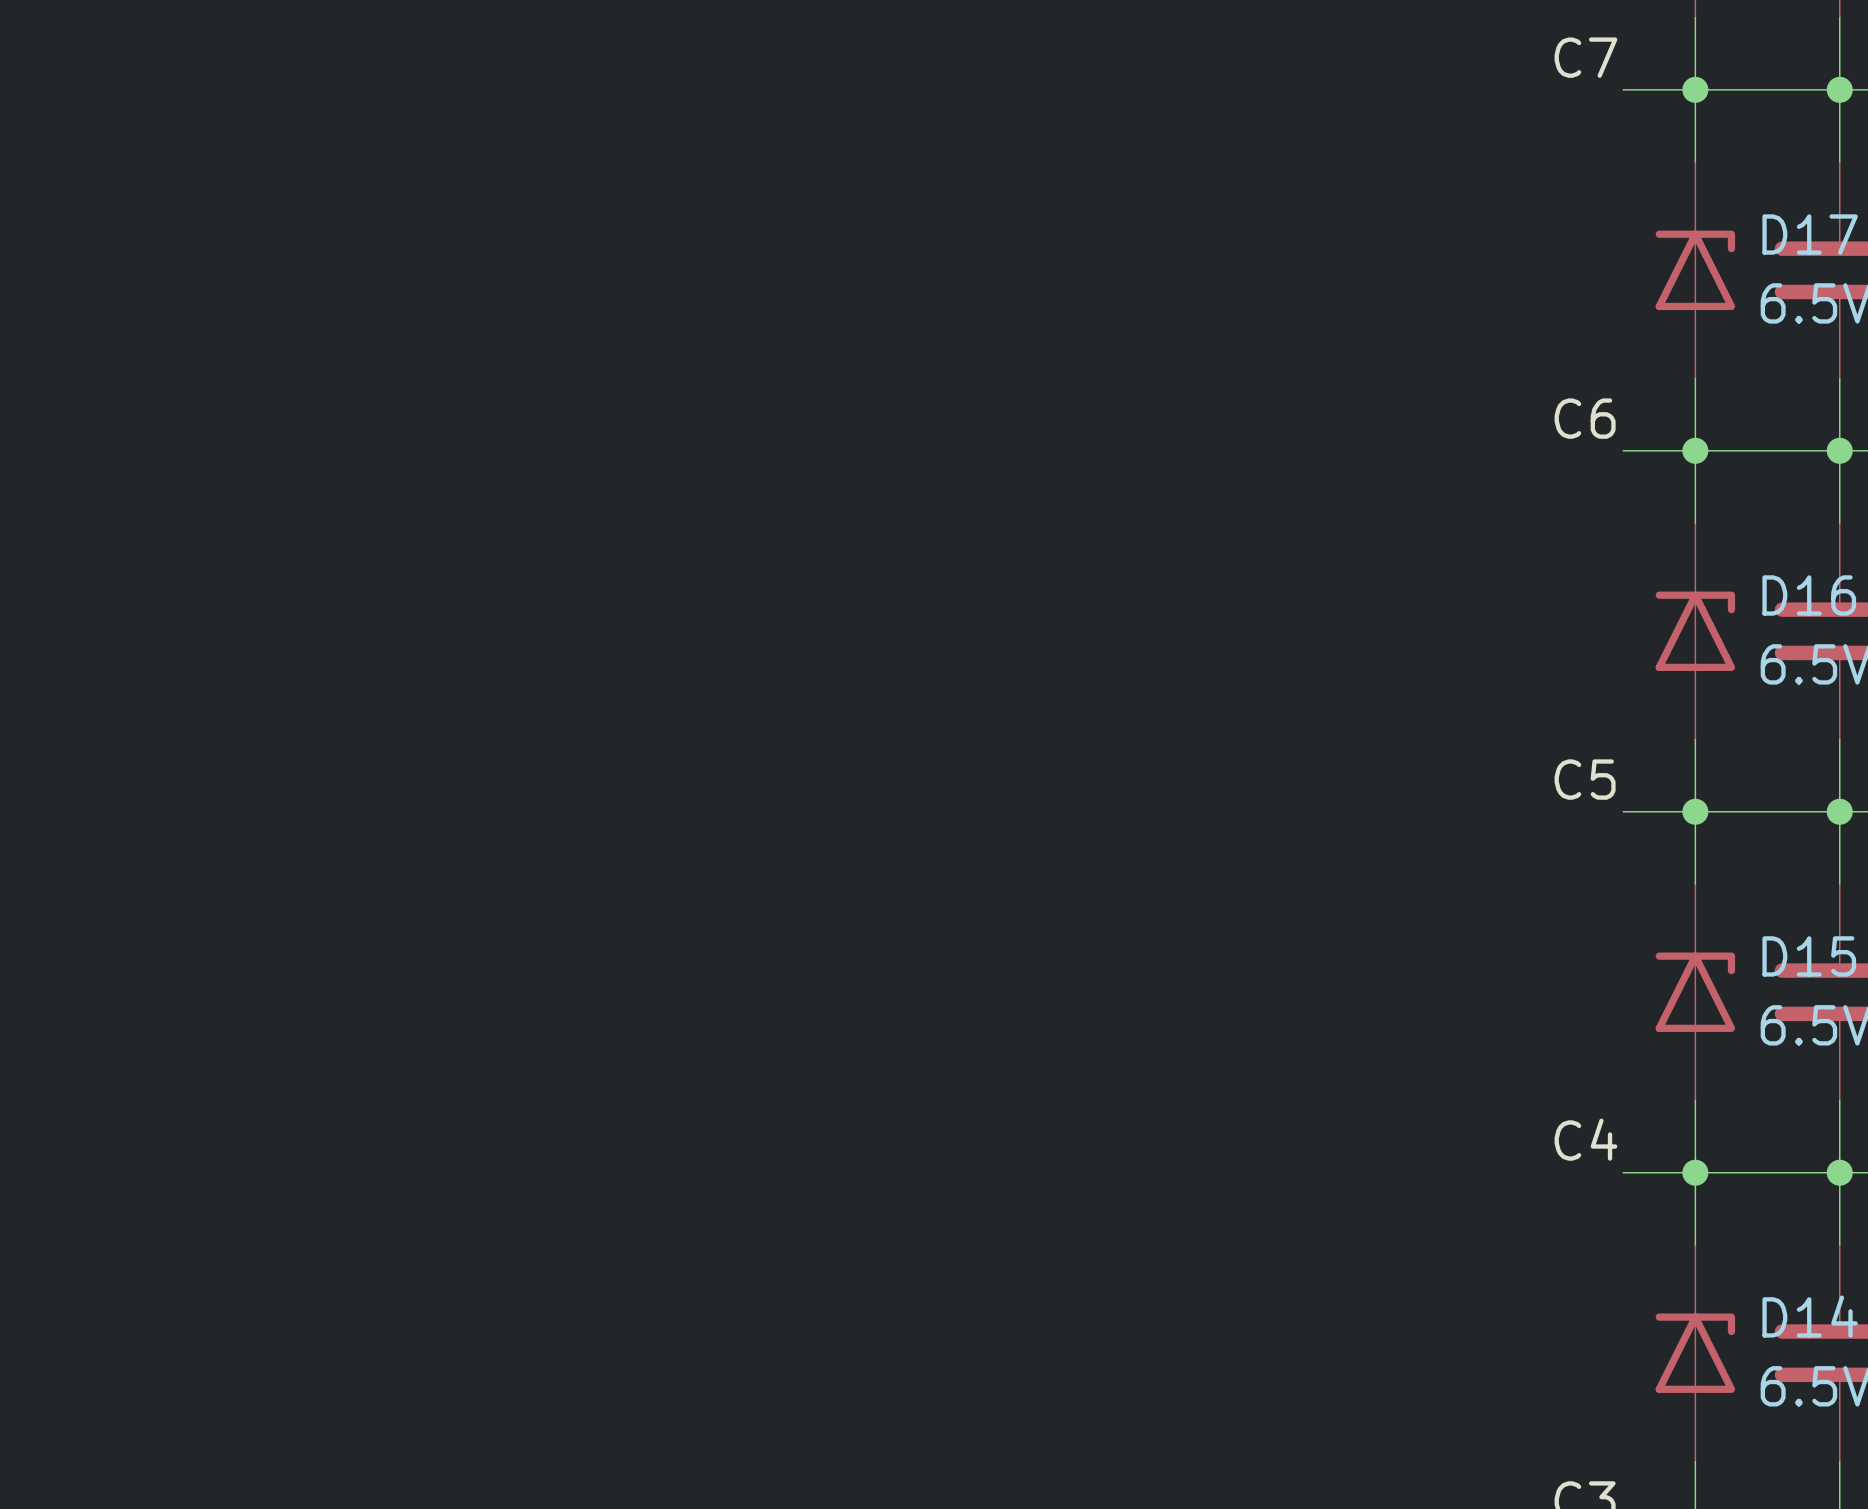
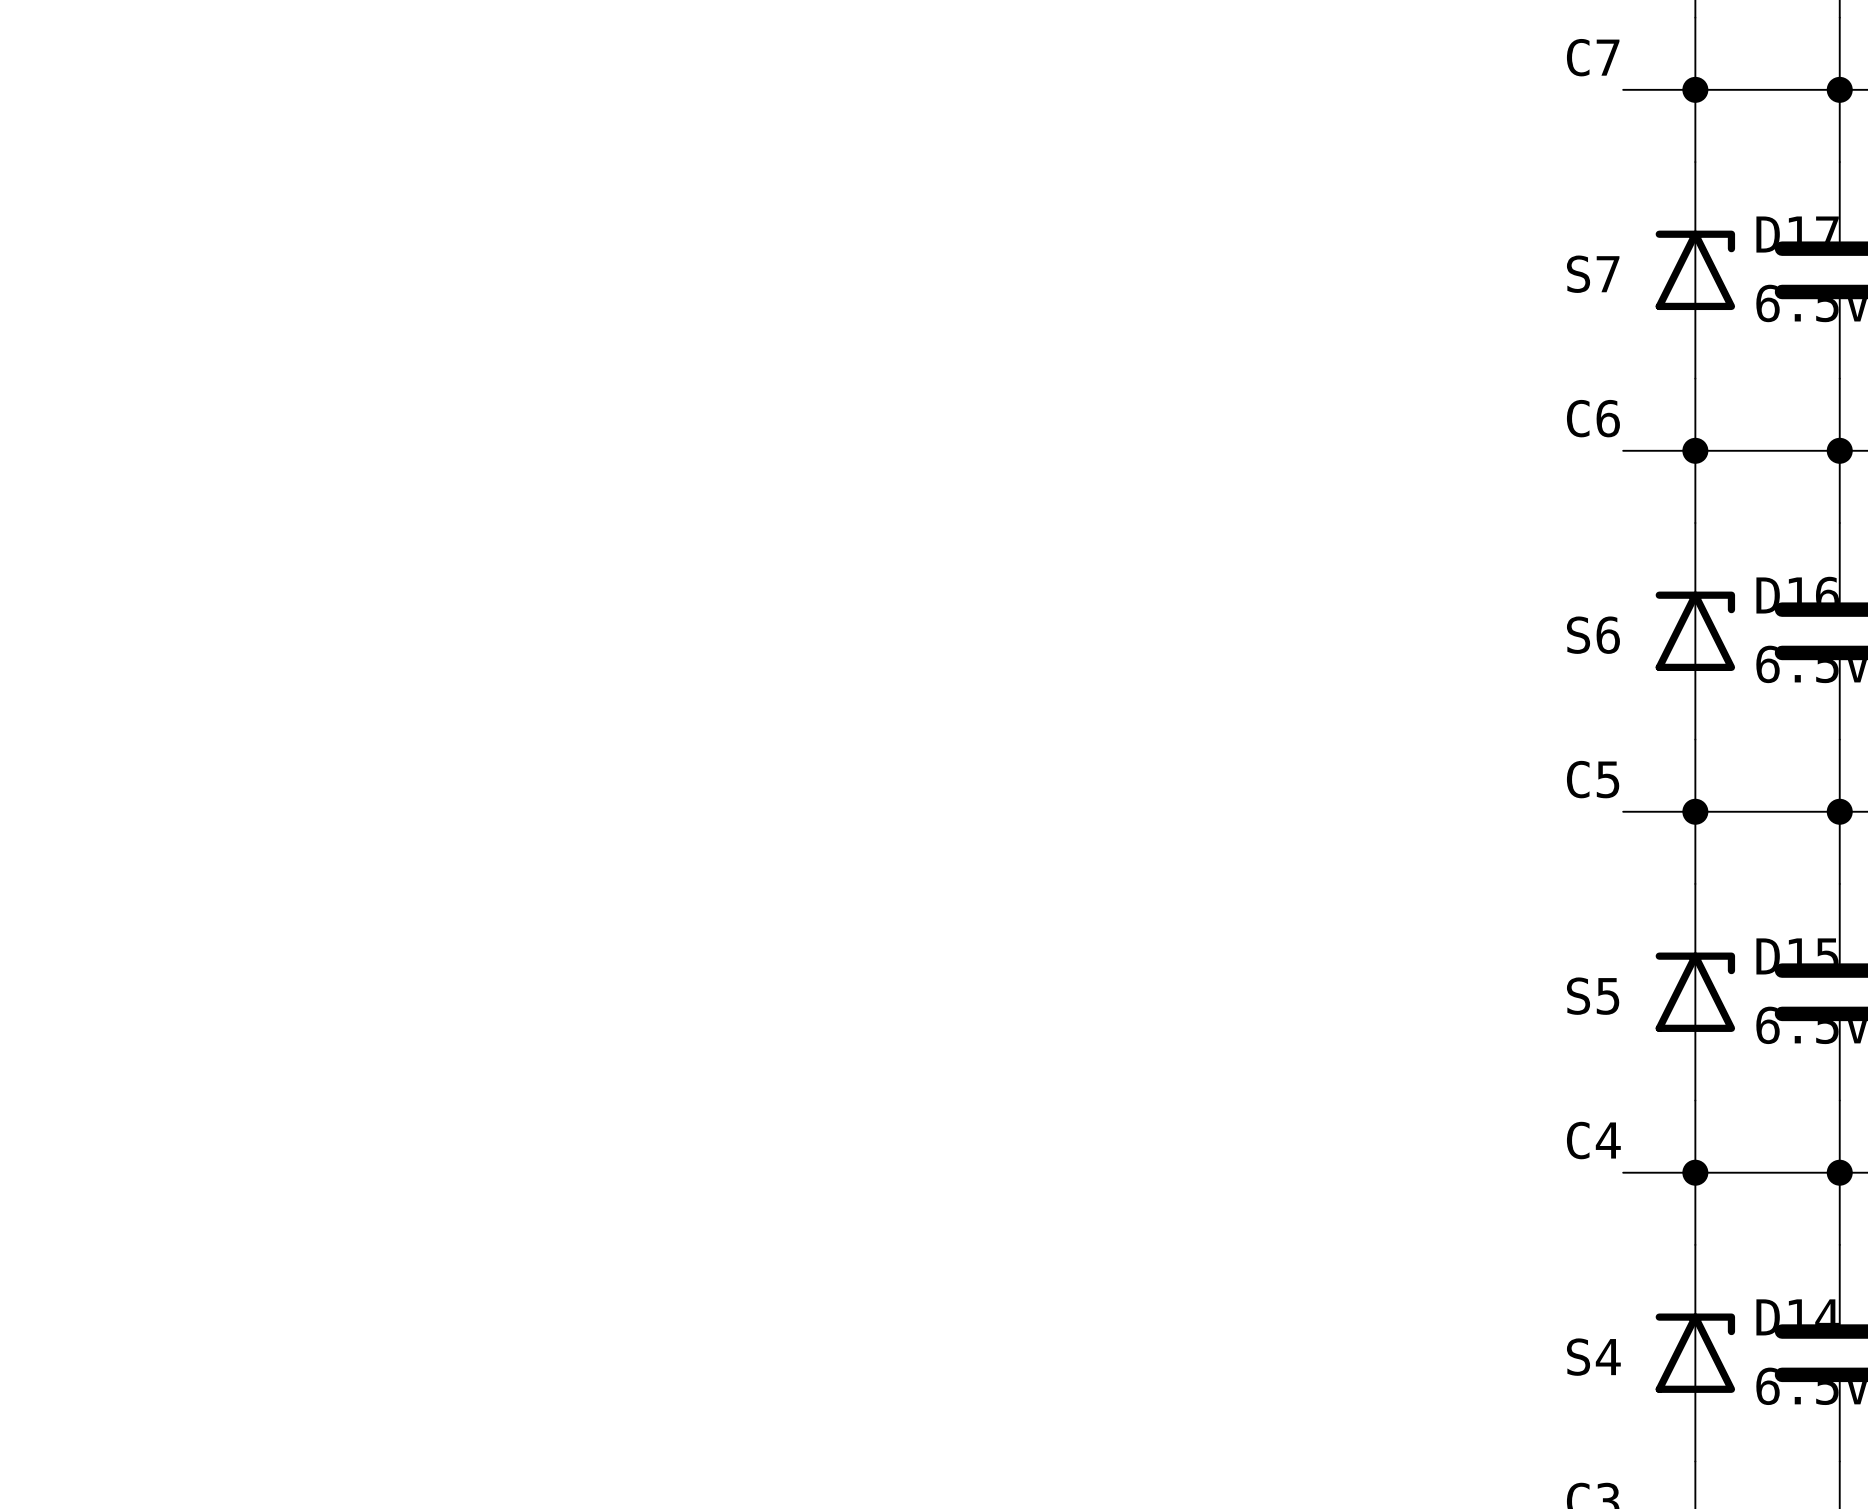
label: none -> S7 (1593, 274)
label: none -> S6 (1593, 635)
label: none -> S5 (1593, 996)
label: none -> S4 (1593, 1357)

